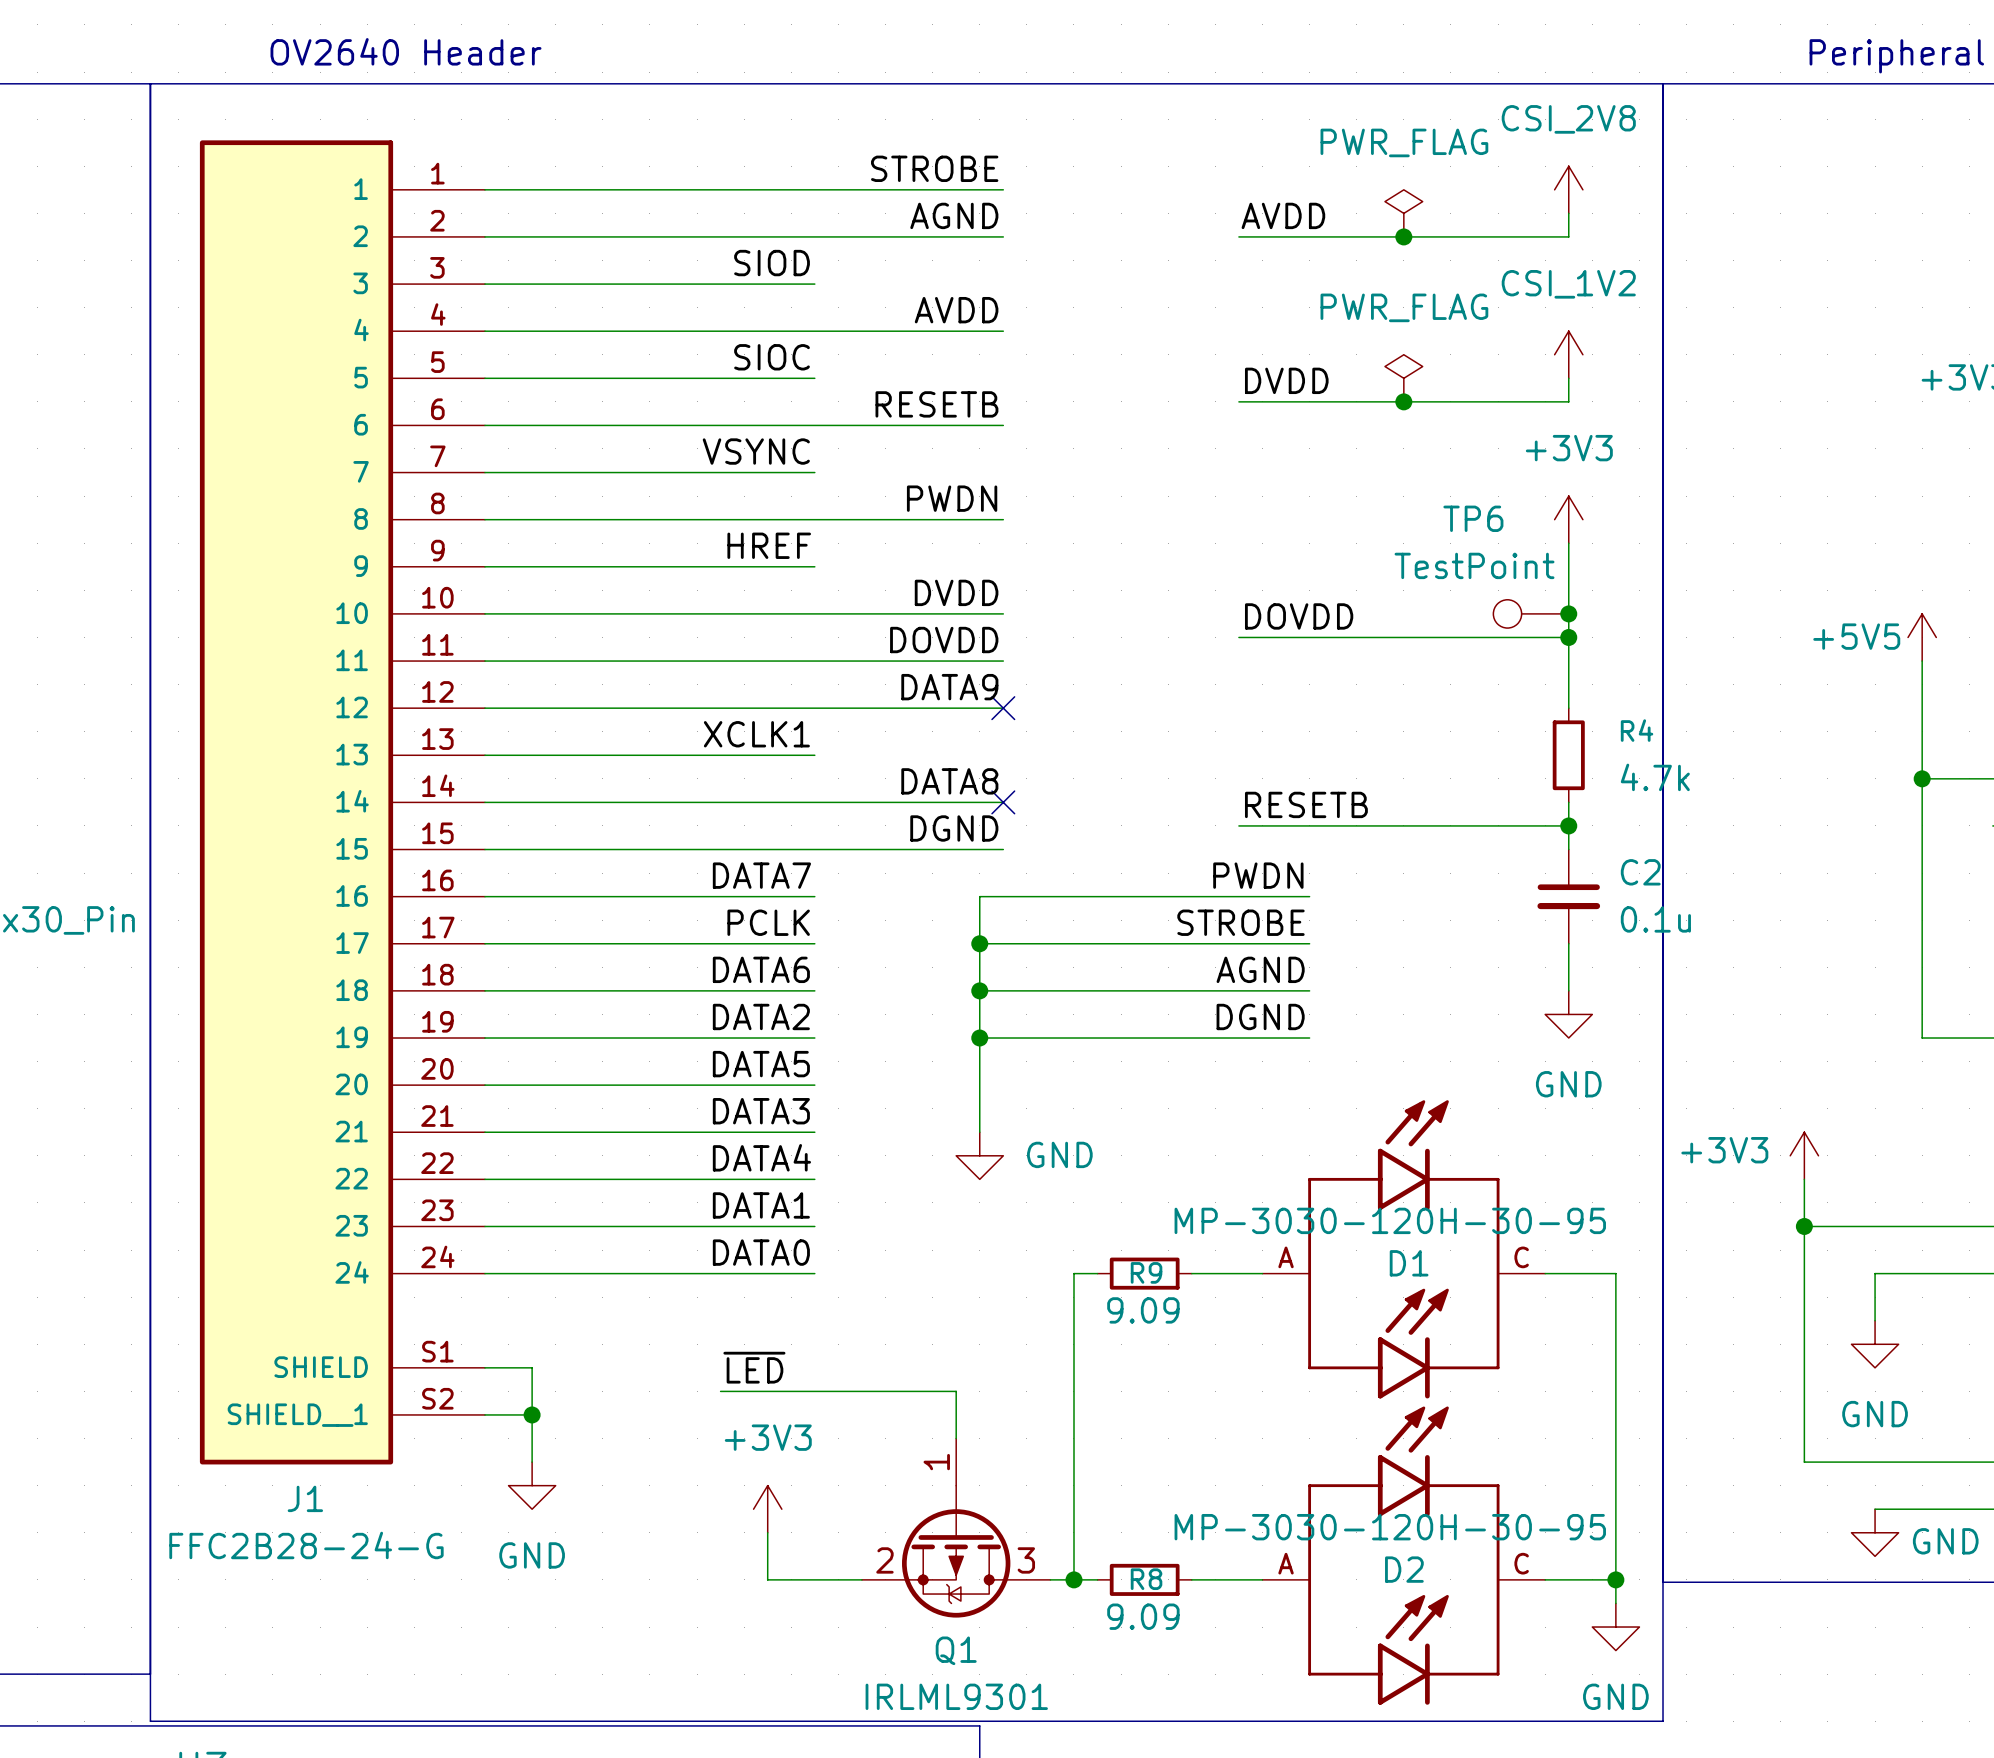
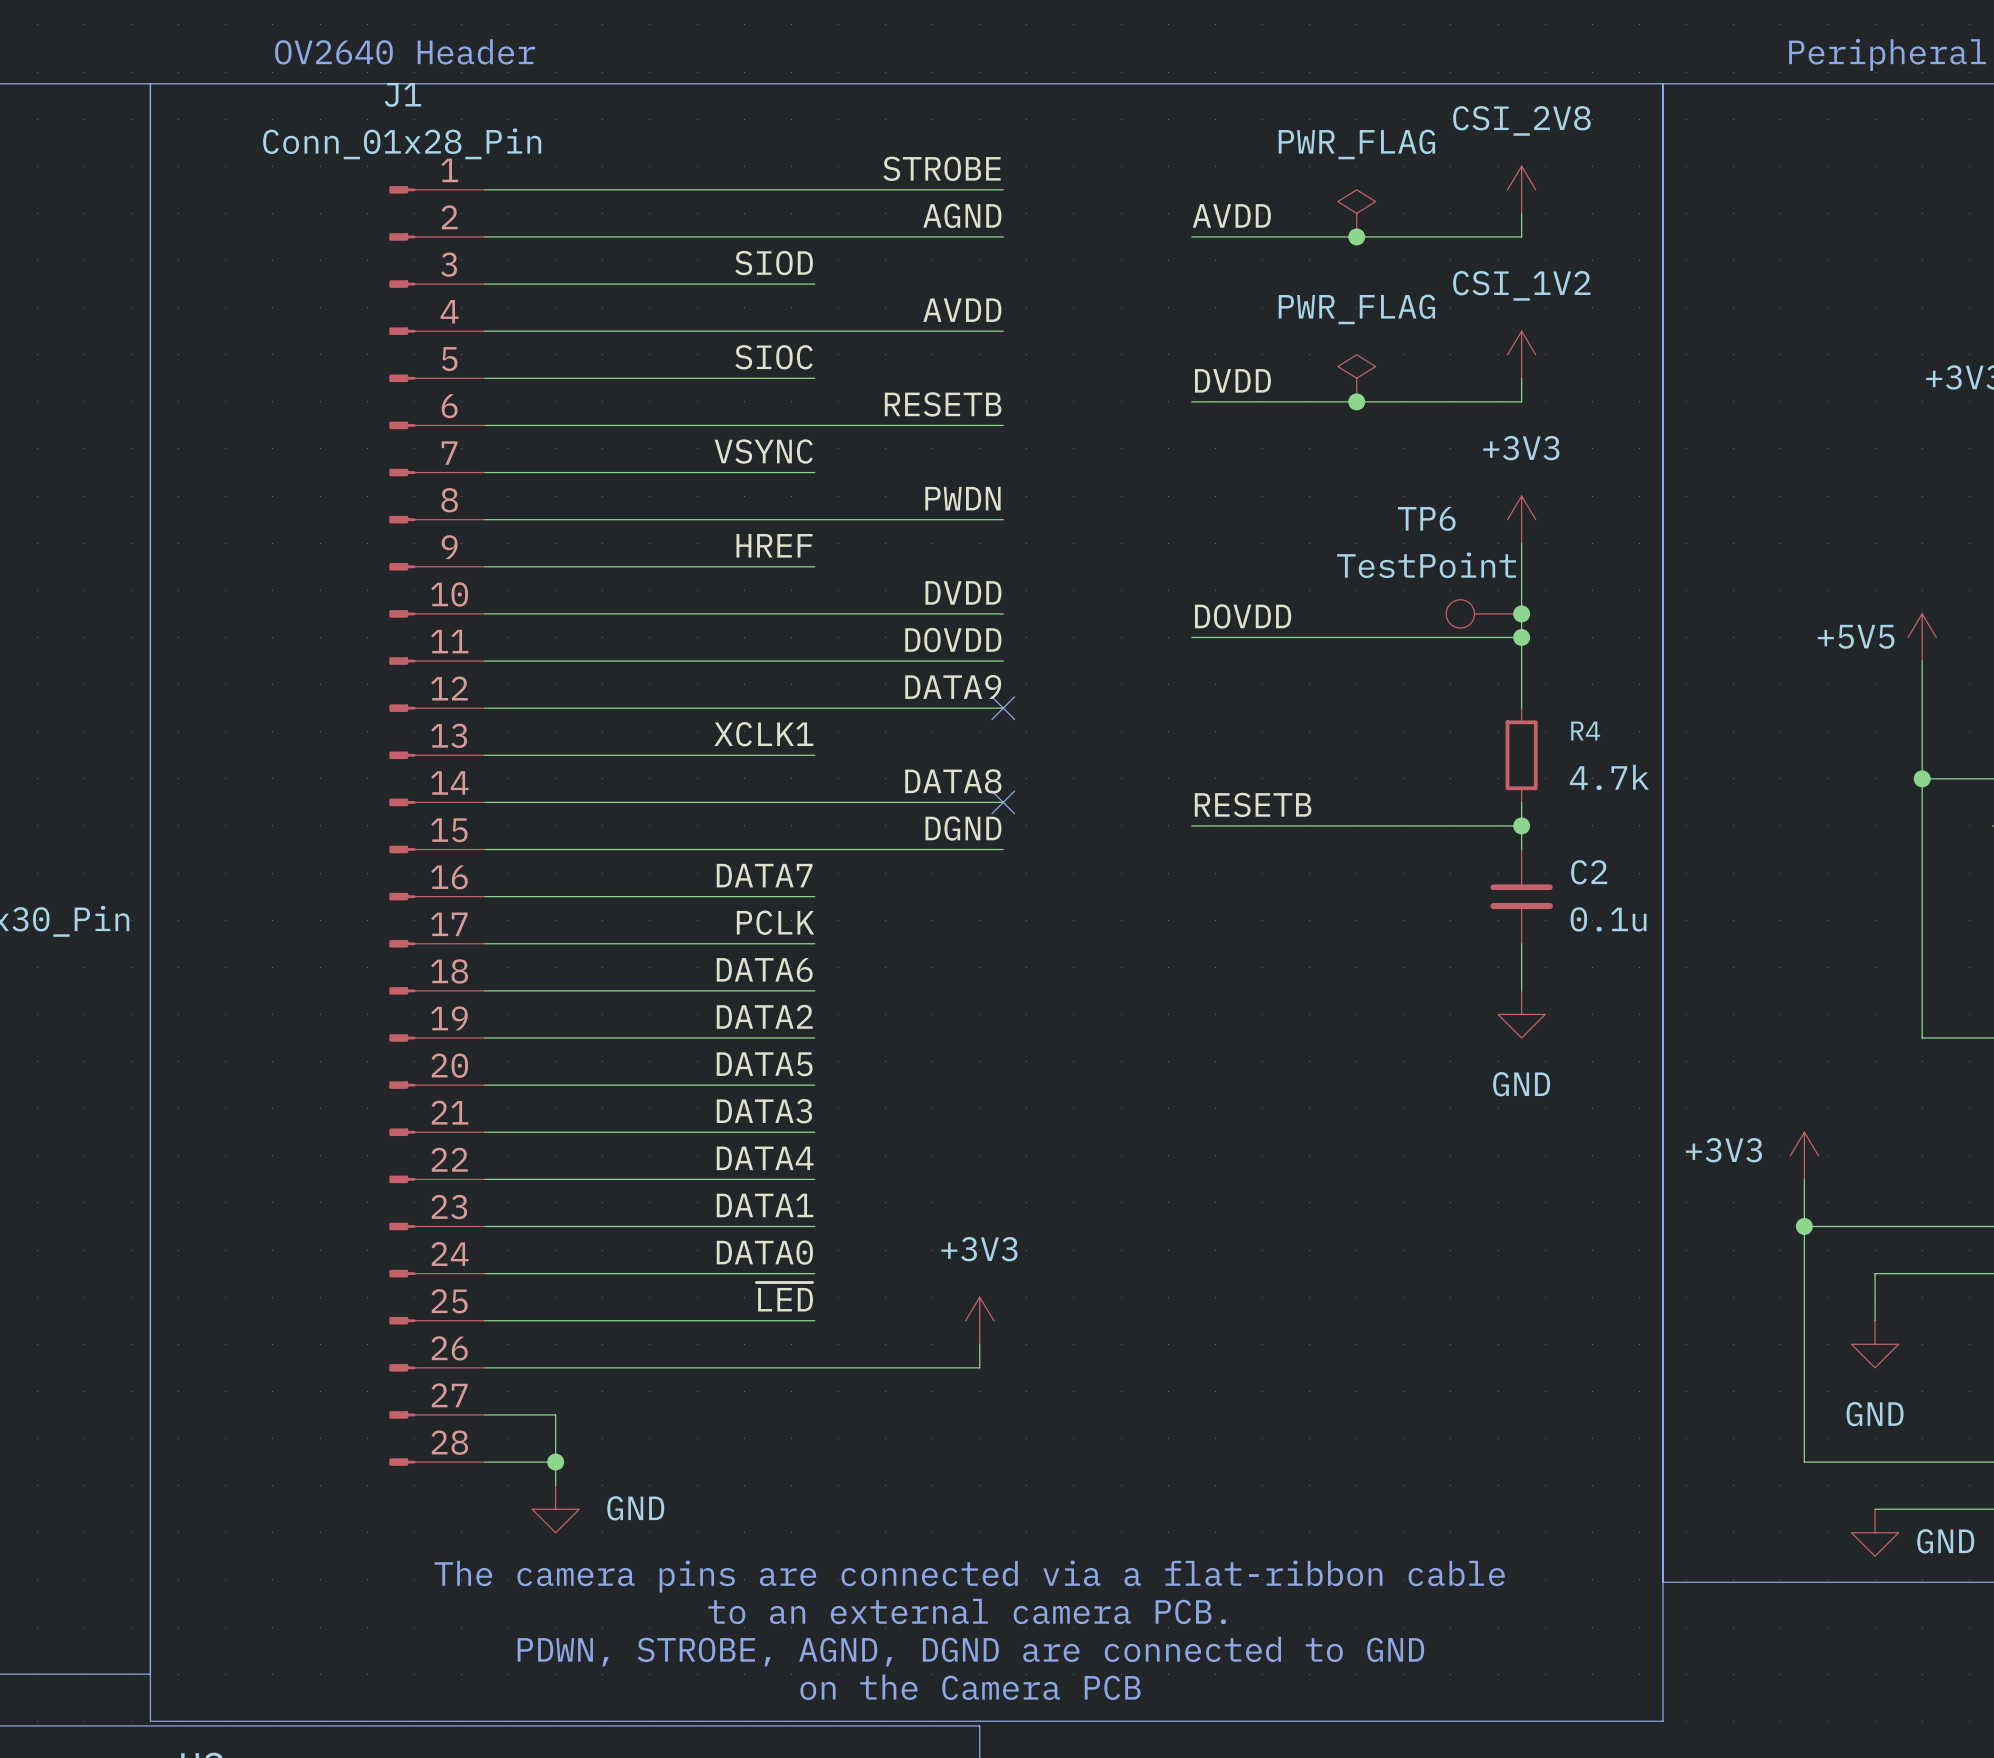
J1 symbol: [199, 140, 485, 1465] -> [389, 186, 485, 1466]
power symbol position: CSI_2V8 (1568, 189) -> CSI_2V8 (1521, 189)
power symbol position: PWR_FLAG (1403, 213) -> PWR_FLAG (1356, 213)
wire: (1568, 213) (1568, 236) (1521, 236) -> (1521, 213) (1521, 236)
label position: AVDD (1283, 215) -> AVDD (1231, 215)
wire: none -> (1191, 236) (1238, 236)
junction position: (1403, 236) -> (1356, 236)
power symbol position: CSI_1V2 (1568, 354) -> CSI_1V2 (1521, 354)
power symbol position: PWR_FLAG (1403, 378) -> PWR_FLAG (1356, 378)
wire: (1568, 378) (1568, 401) (1521, 401) -> (1521, 378) (1521, 401)
label position: DVDD (1286, 380) -> DVDD (1232, 380)
wire: none -> (1191, 401) (1238, 401)
junction position: (1403, 401) -> (1356, 401)
power symbol position: +3V3 (1568, 519) -> +3V3 (1521, 519)
wire: (1568, 543) (1568, 708) -> (1521, 543) (1521, 708)
junction: none -> (1521, 613)
TP6 position: (1531, 613) -> (1483, 613)
junction: (1568, 613) -> none
label position: DOVDD (1299, 616) -> DOVDD (1243, 616)
wire: (1521, 637) (1568, 637) -> (1191, 637) (1238, 637)
junction: none -> (1521, 637)
junction: (1568, 637) -> none
R4 position: (1568, 755) -> (1521, 755)
wire: (1568, 802) (1568, 849) -> (1521, 802) (1521, 849)
label position: RESETB (1306, 804) -> RESETB (1253, 804)
wire: (1521, 825) (1568, 825) -> (1191, 825) (1238, 825)
junction position: (1568, 825) -> (1521, 825)
label: PWDN (1258, 875) -> none
wire: (1309, 896) (979, 896) (979, 1132) -> none
C2 position: (1568, 896) -> (1521, 896)
label: STROBE (1240, 922) -> none
wire: (979, 943) (1309, 943) -> none
junction: (979, 943) -> none
wire: (1568, 943) (1568, 990) -> (1521, 943) (1521, 990)
label: AGND (1260, 969) -> none
wire: (979, 990) (1309, 990) -> none
junction: (979, 990) -> none
power symbol position: GND (1568, 1014) -> GND (1521, 1014)
label: DGND (1260, 1016) -> none
wire: (979, 1038) (1309, 1038) -> none
junction: (979, 1038) -> none
power symbol: GND (979, 1155) -> none
D1: MP-3030-120H-30-95 (1403, 1249) -> none
wire: (1097, 1273) (1073, 1273) (1073, 1579) -> none
R9: 9.09 (1144, 1273) -> none
wire: (1191, 1273) (1262, 1273) -> none
wire: (1545, 1273) (1615, 1273) (1615, 1603) -> none
wire: none -> (484, 1320) (814, 1320)
wire: (532, 1367) (532, 1462) -> (532, 1367) (979, 1367) (979, 1344)
label position: ~{LED} (754, 1367) -> ~{LED} (784, 1296)
wire: (720, 1391) (956, 1391) (956, 1438) -> none
wire: none -> (532, 1414) (555, 1414) (555, 1485)
junction position: (532, 1414) -> (555, 1462)
wire: none -> (484, 1462) (555, 1462)
power symbol position: GND (532, 1485) -> GND (555, 1509)
J1 name position: J1 (305, 1498) -> J1 (402, 94)
power symbol position: +3V3 (767, 1509) -> +3V3 (979, 1320)
Q1: IRLML9301 (956, 1528) -> none
wire: (767, 1532) (767, 1579) (861, 1579) -> none
J1 value: FFC2B28-24-G (306, 1545) -> Conn_01x28_Pin (402, 143)
power symbol text position: GND (532, 1555) -> GND (635, 1508)
D2: MP-3030-120H-30-95 (1403, 1555) -> none
text: none -> The camera pins are connected via a flat-ribbon cable (969, 1576)
wire: (1050, 1579) (1097, 1579) -> none
junction: (1073, 1579) -> none
R8: 9.09 (1144, 1579) -> none
wire: (1191, 1579) (1262, 1579) -> none
wire: (1545, 1579) (1615, 1579) -> none
junction: (1615, 1579) -> none
text: none -> to an external camera PCB. (967, 1611)
power symbol: GND (1615, 1627) -> none
text: none -> PDWN, STROBE, AGND, DGND are connected to GND (970, 1651)
text: none -> on the Camera PCB (970, 1687)

